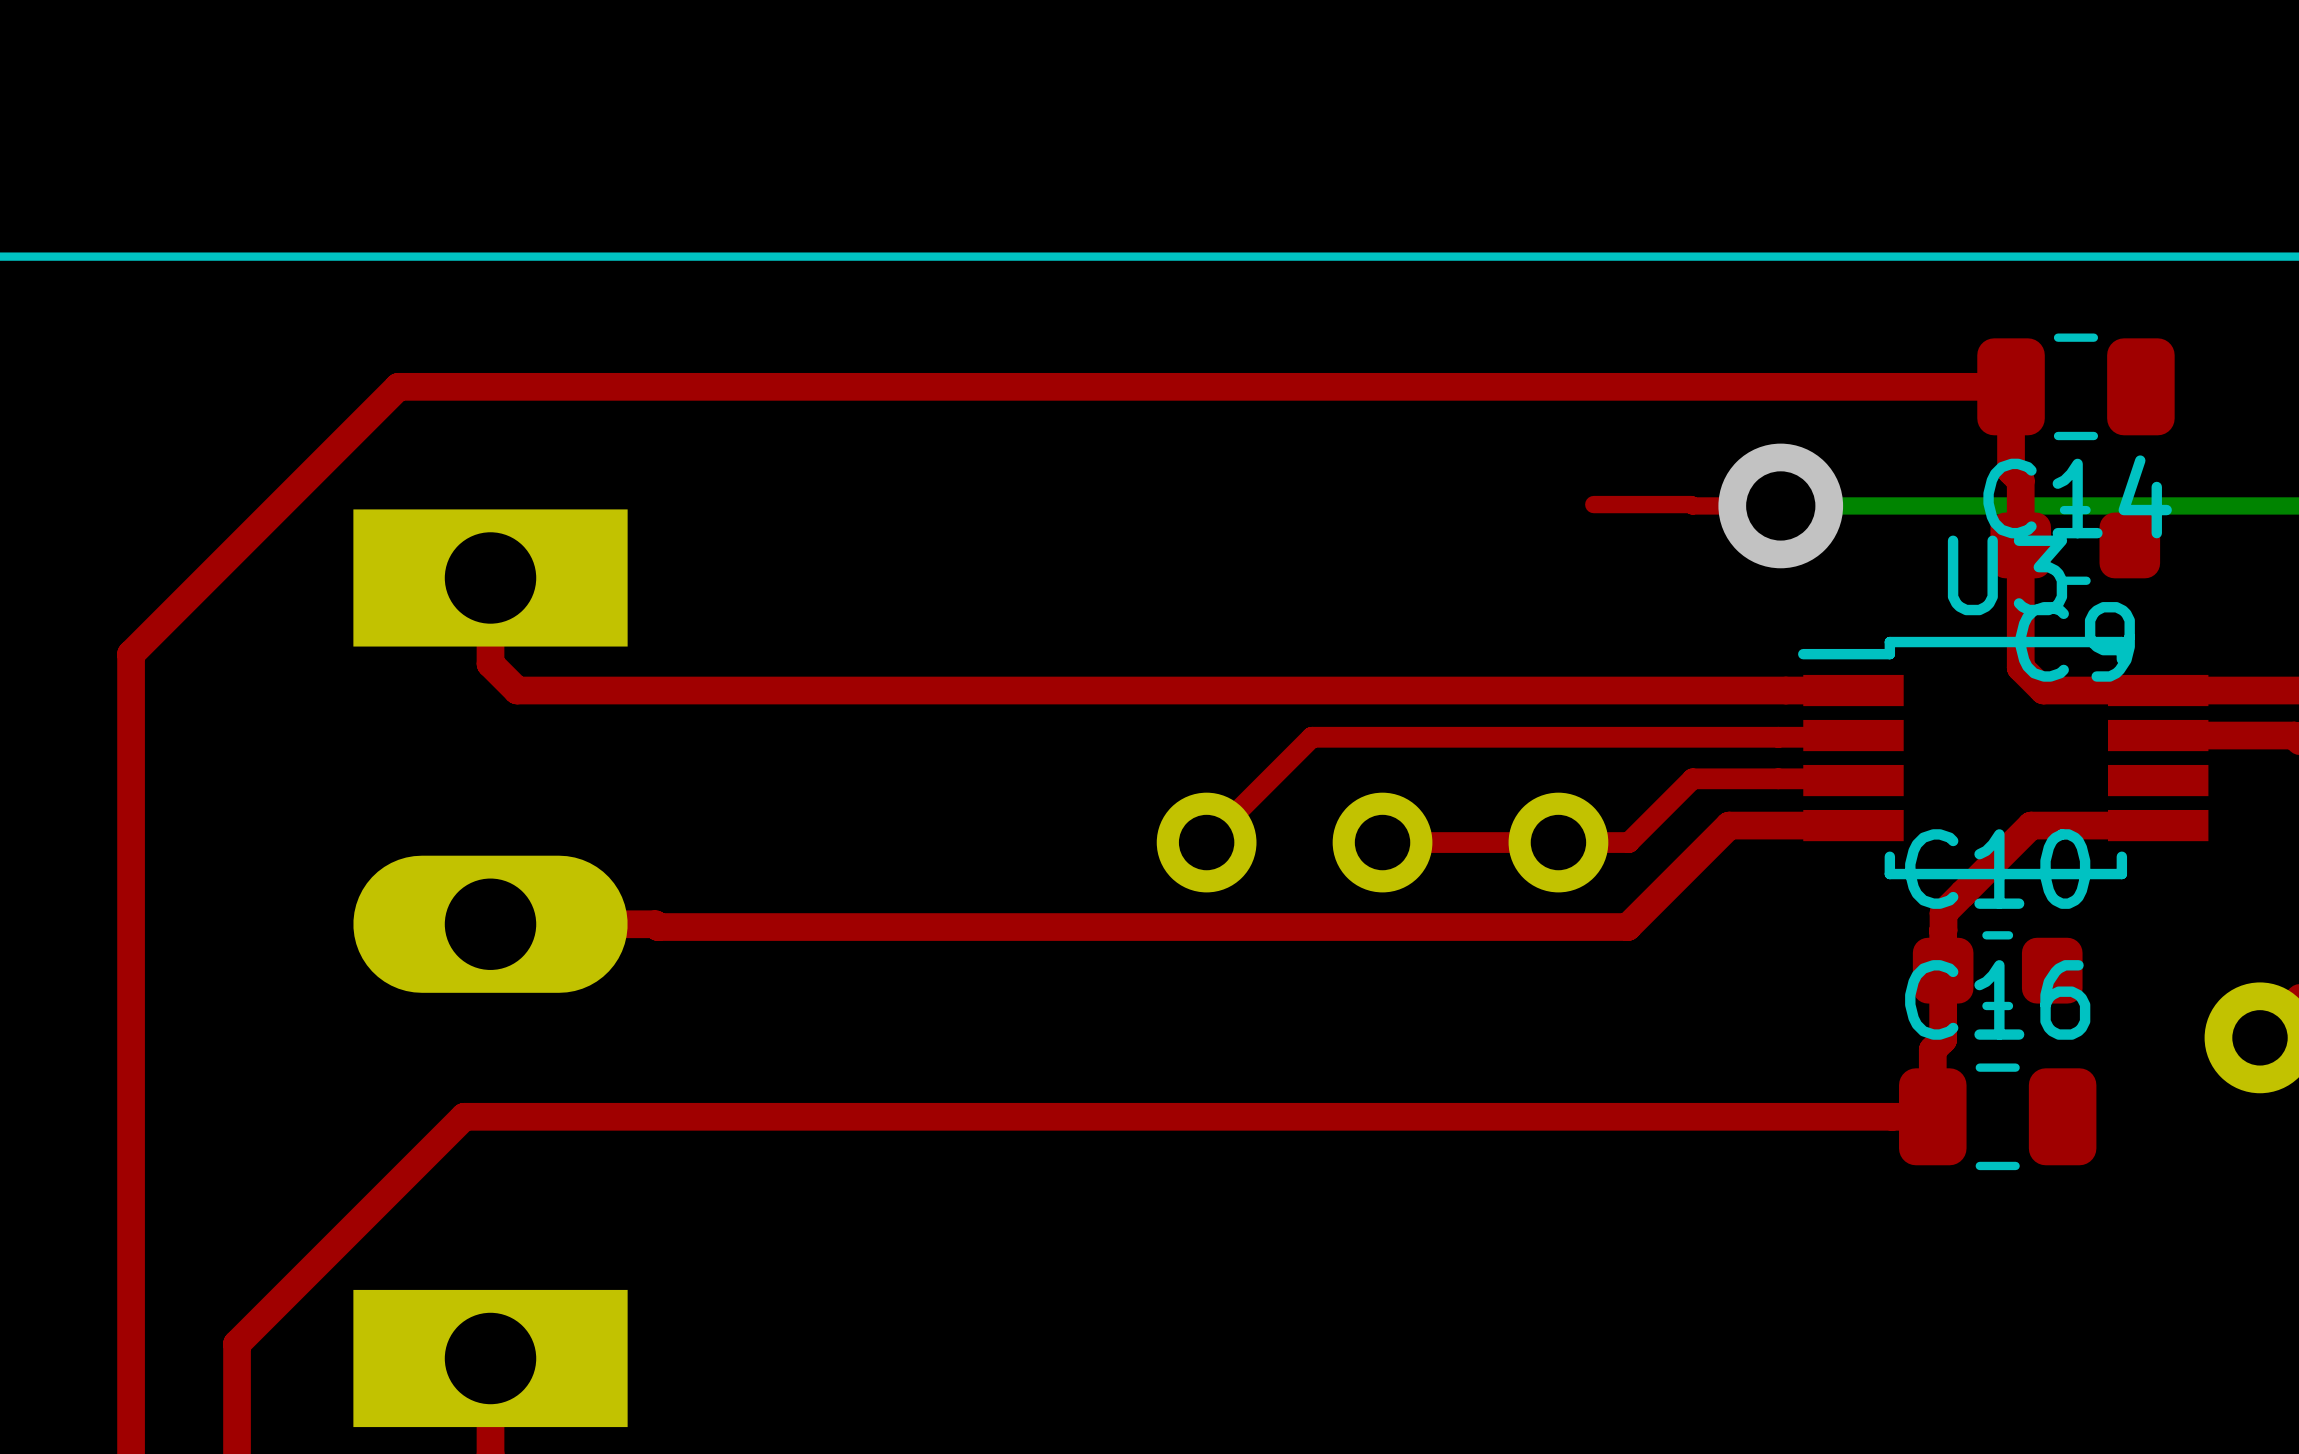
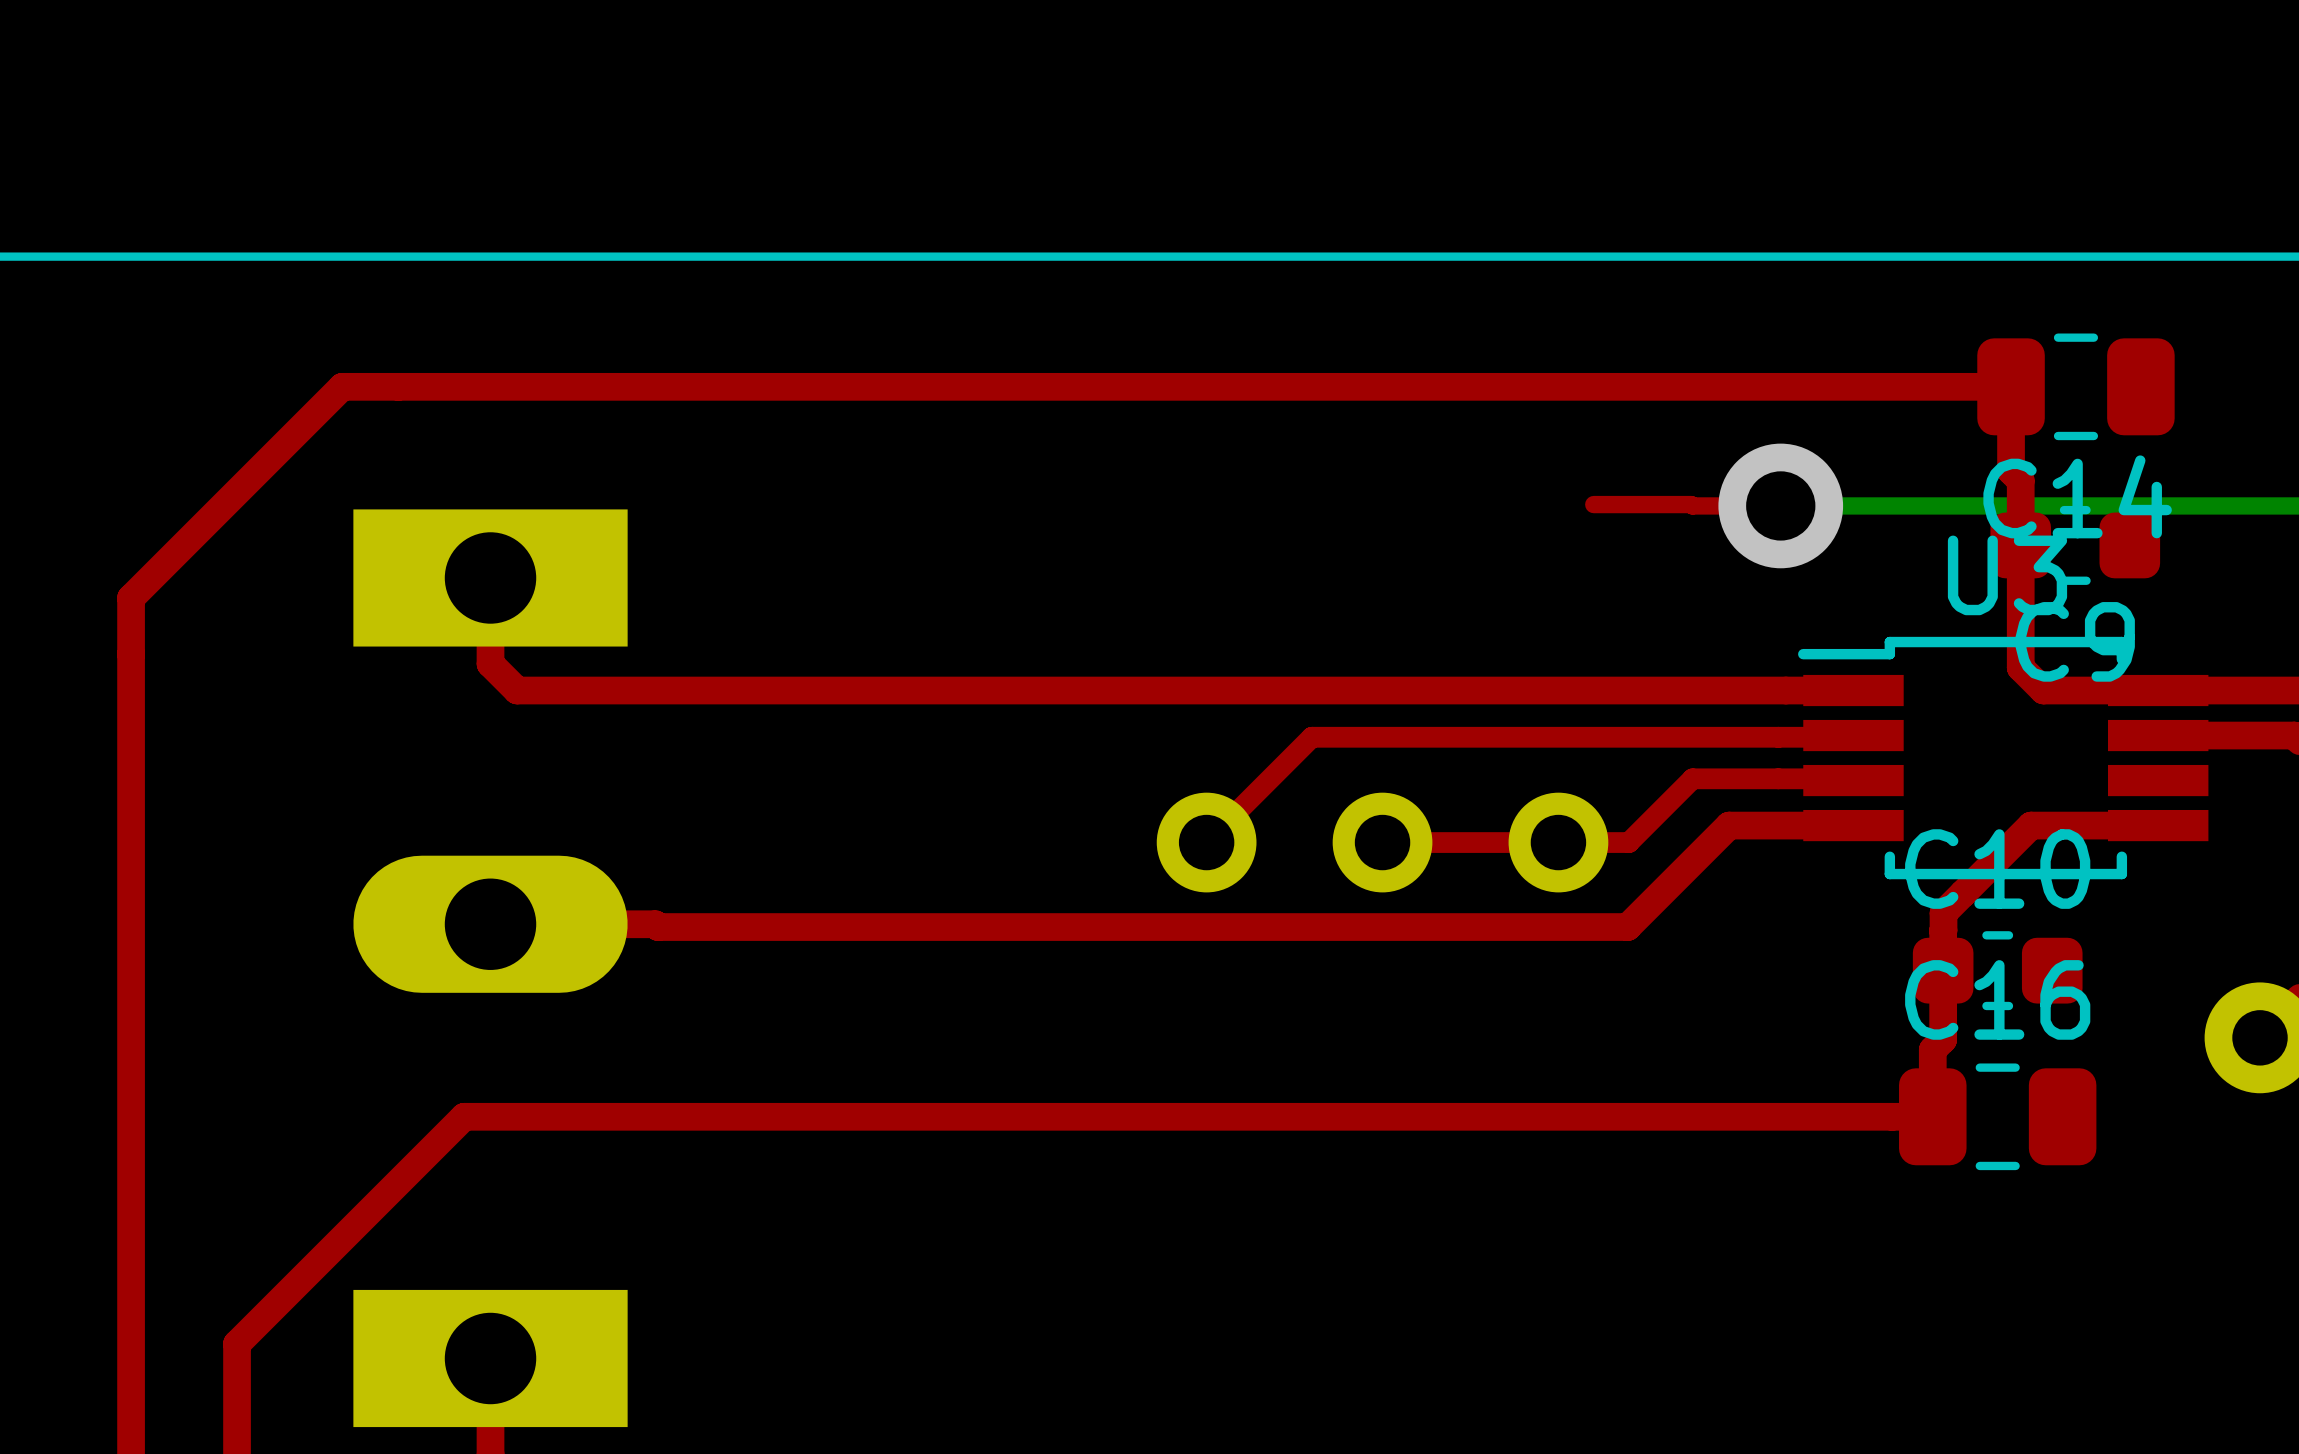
top track: (398, 386) (131, 654) -> (398, 386) (342, 386) (131, 598) (131, 654)

